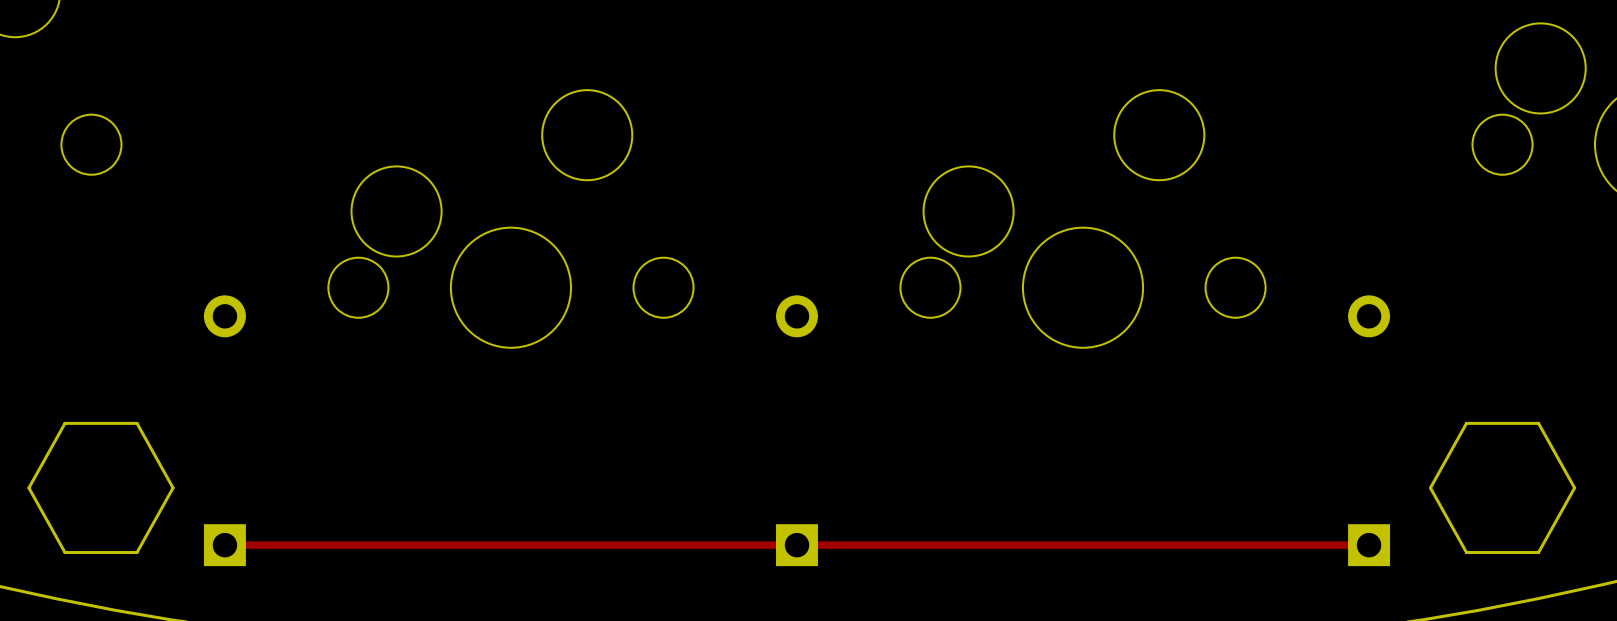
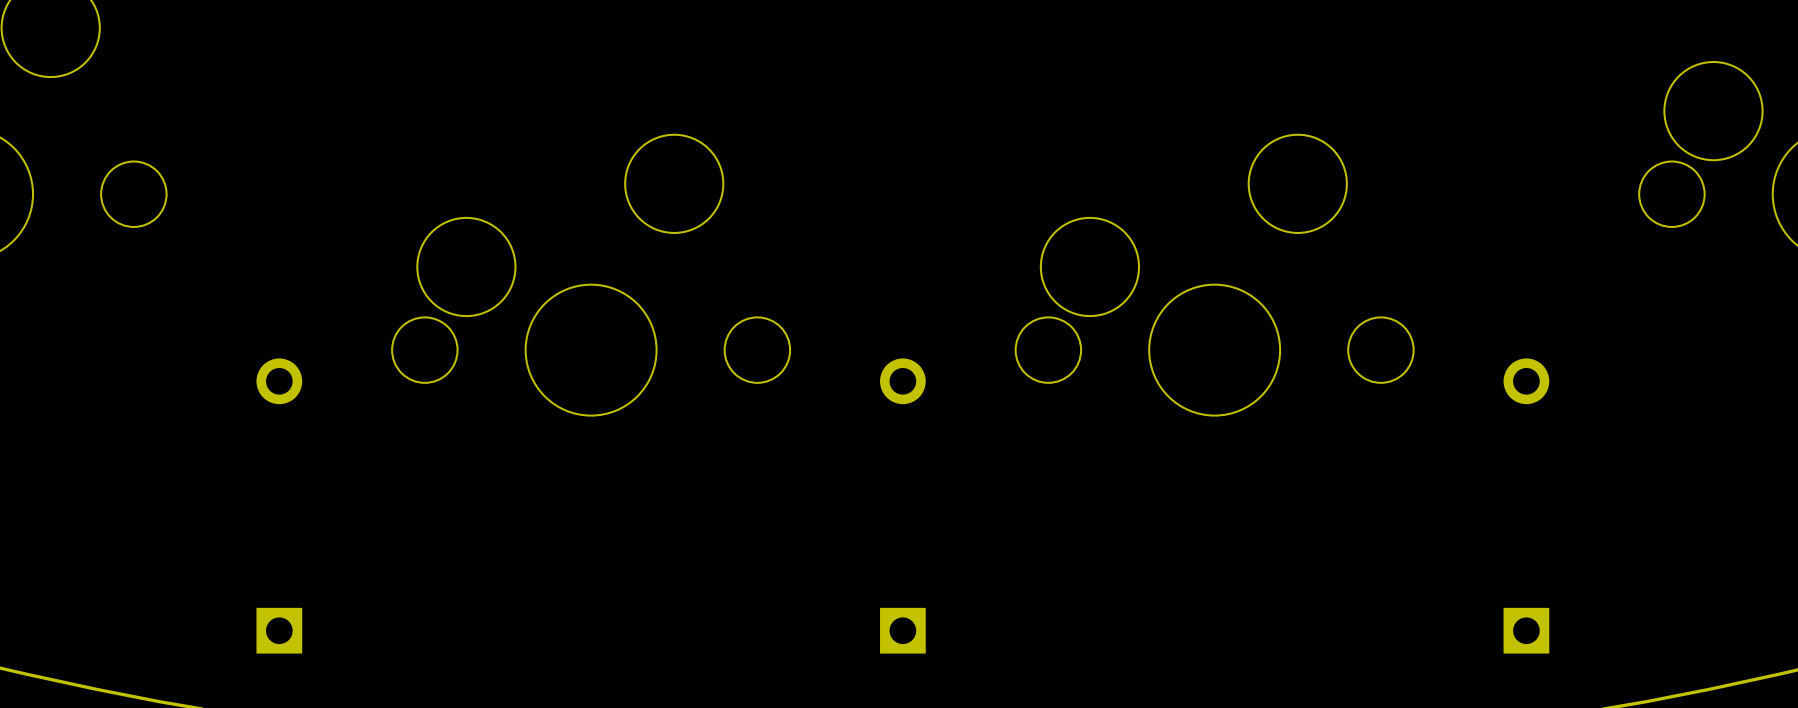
drawing: [27, 421, 175, 555] -> none
drawing: [1428, 421, 1577, 555] -> none
track: (224, 545) (1369, 545) -> none

